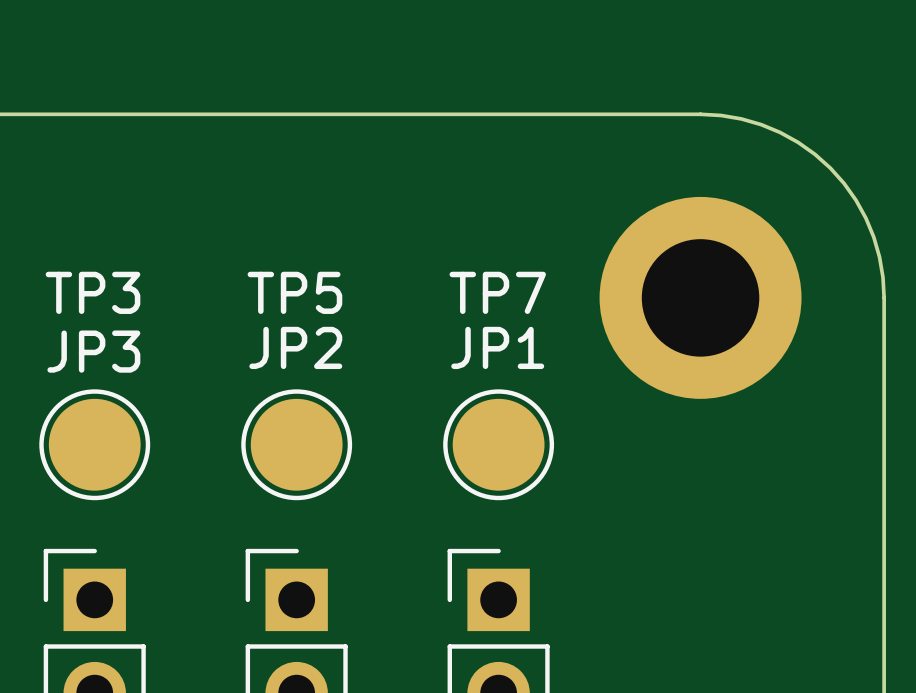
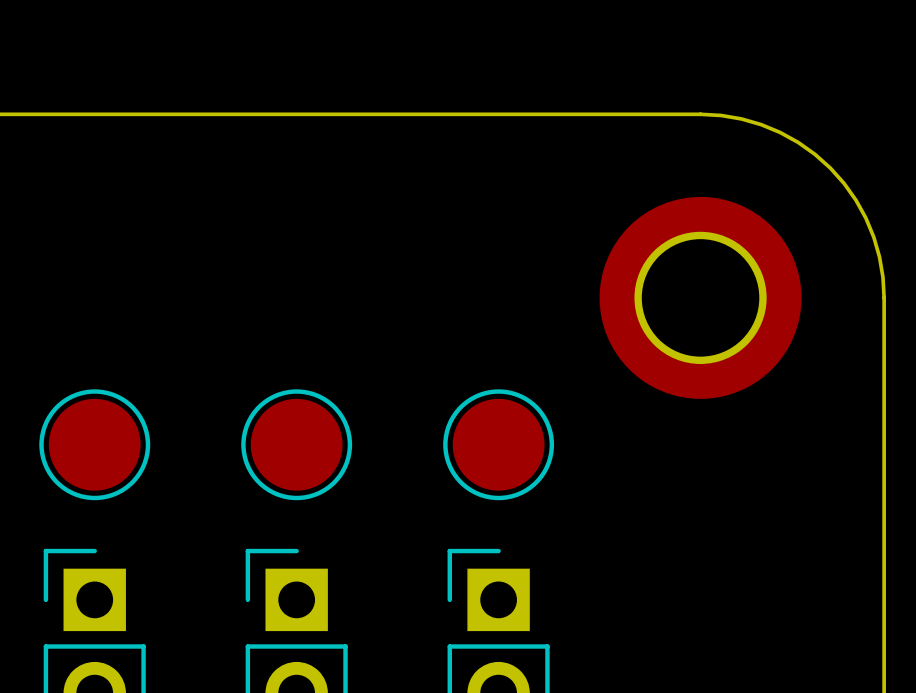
TP3 name: TP3 (92, 292) -> none
TP5 name: TP5 (294, 292) -> none
TP7 name: TP7 (497, 292) -> none
JP2 name: JP2 (295, 347) -> none
JP1 name: JP1 (497, 347) -> none
JP3 name: JP3 (93, 351) -> none

